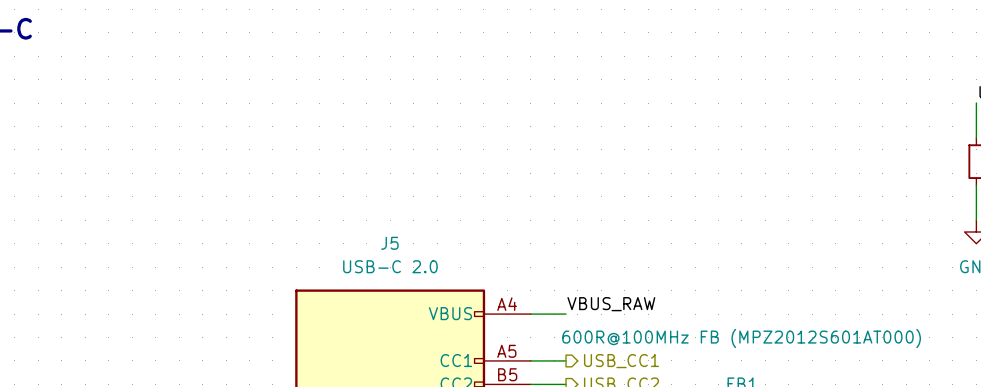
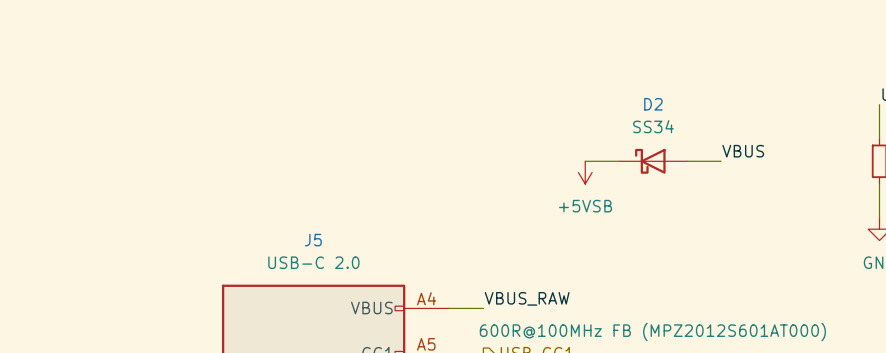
label: none -> VBUS (743, 151)
wire: none -> (585, 161) (619, 161)
D2: none -> SS34 (653, 161)
wire: none -> (687, 161) (721, 161)
power symbol: none -> +5VSB (585, 172)

